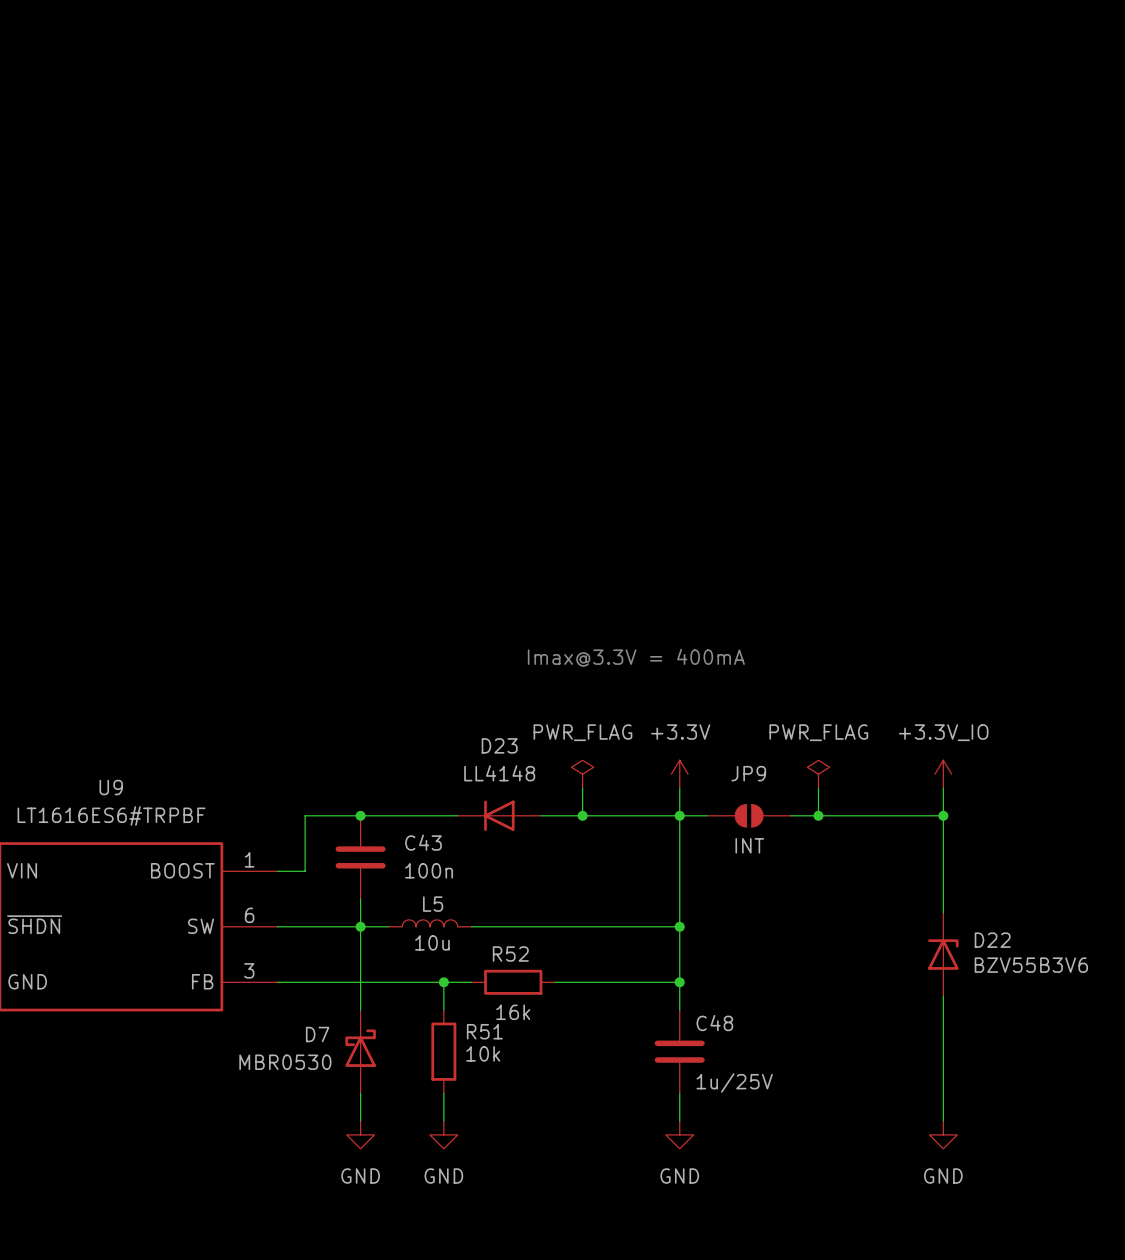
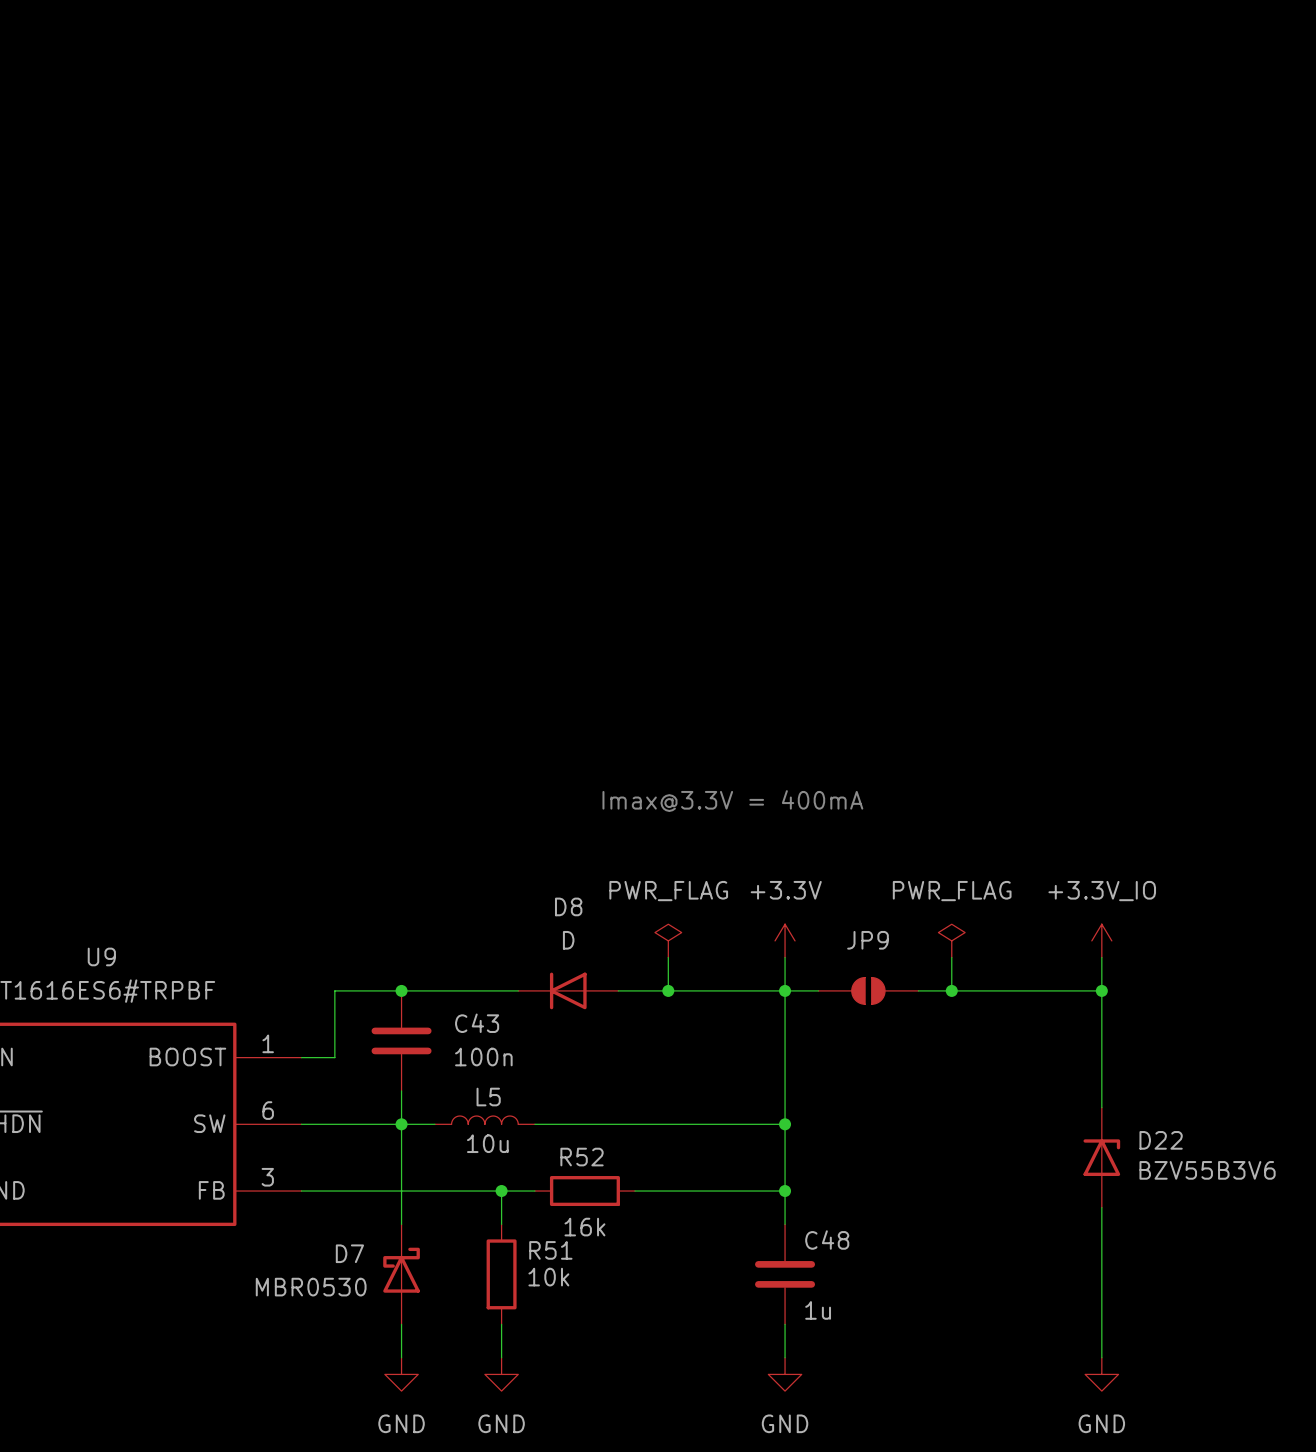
D23 name: D23 (499, 745) -> D8 (568, 906)
D23 value: LL4148 (499, 773) -> D (568, 940)
JP9 value: INT (749, 845) -> none
C48 value: 1u/25V (734, 1083) -> 1u (818, 1310)

